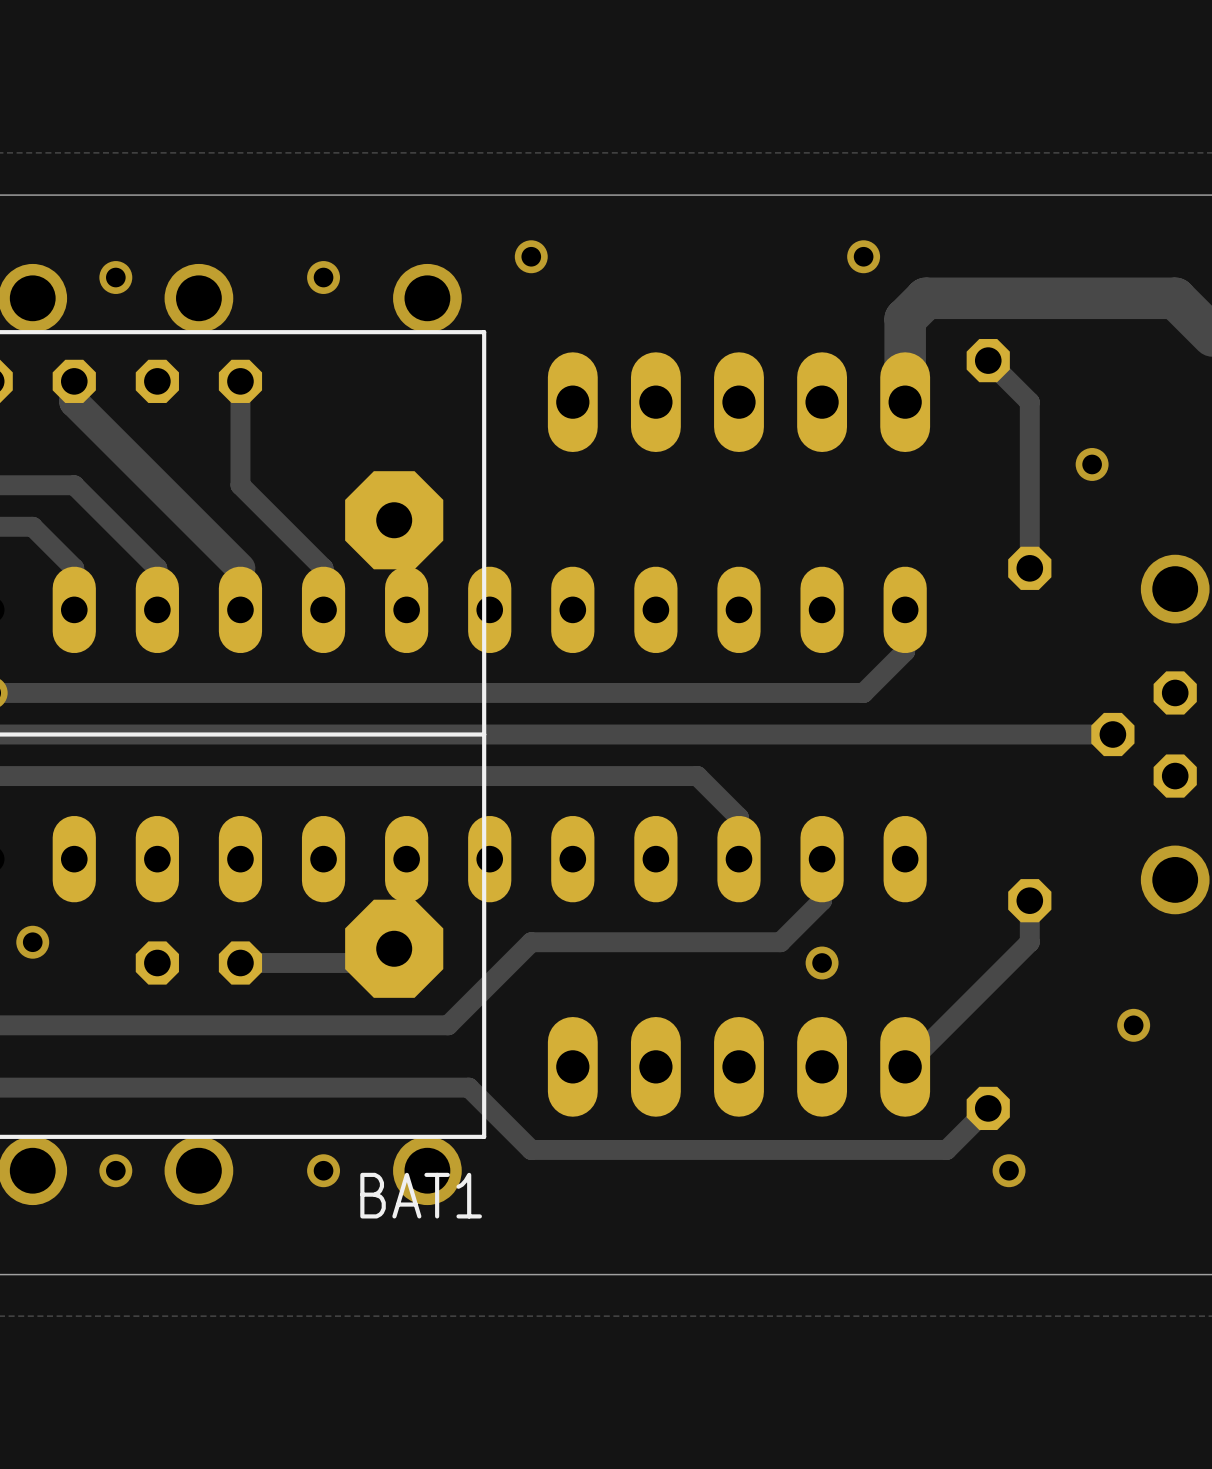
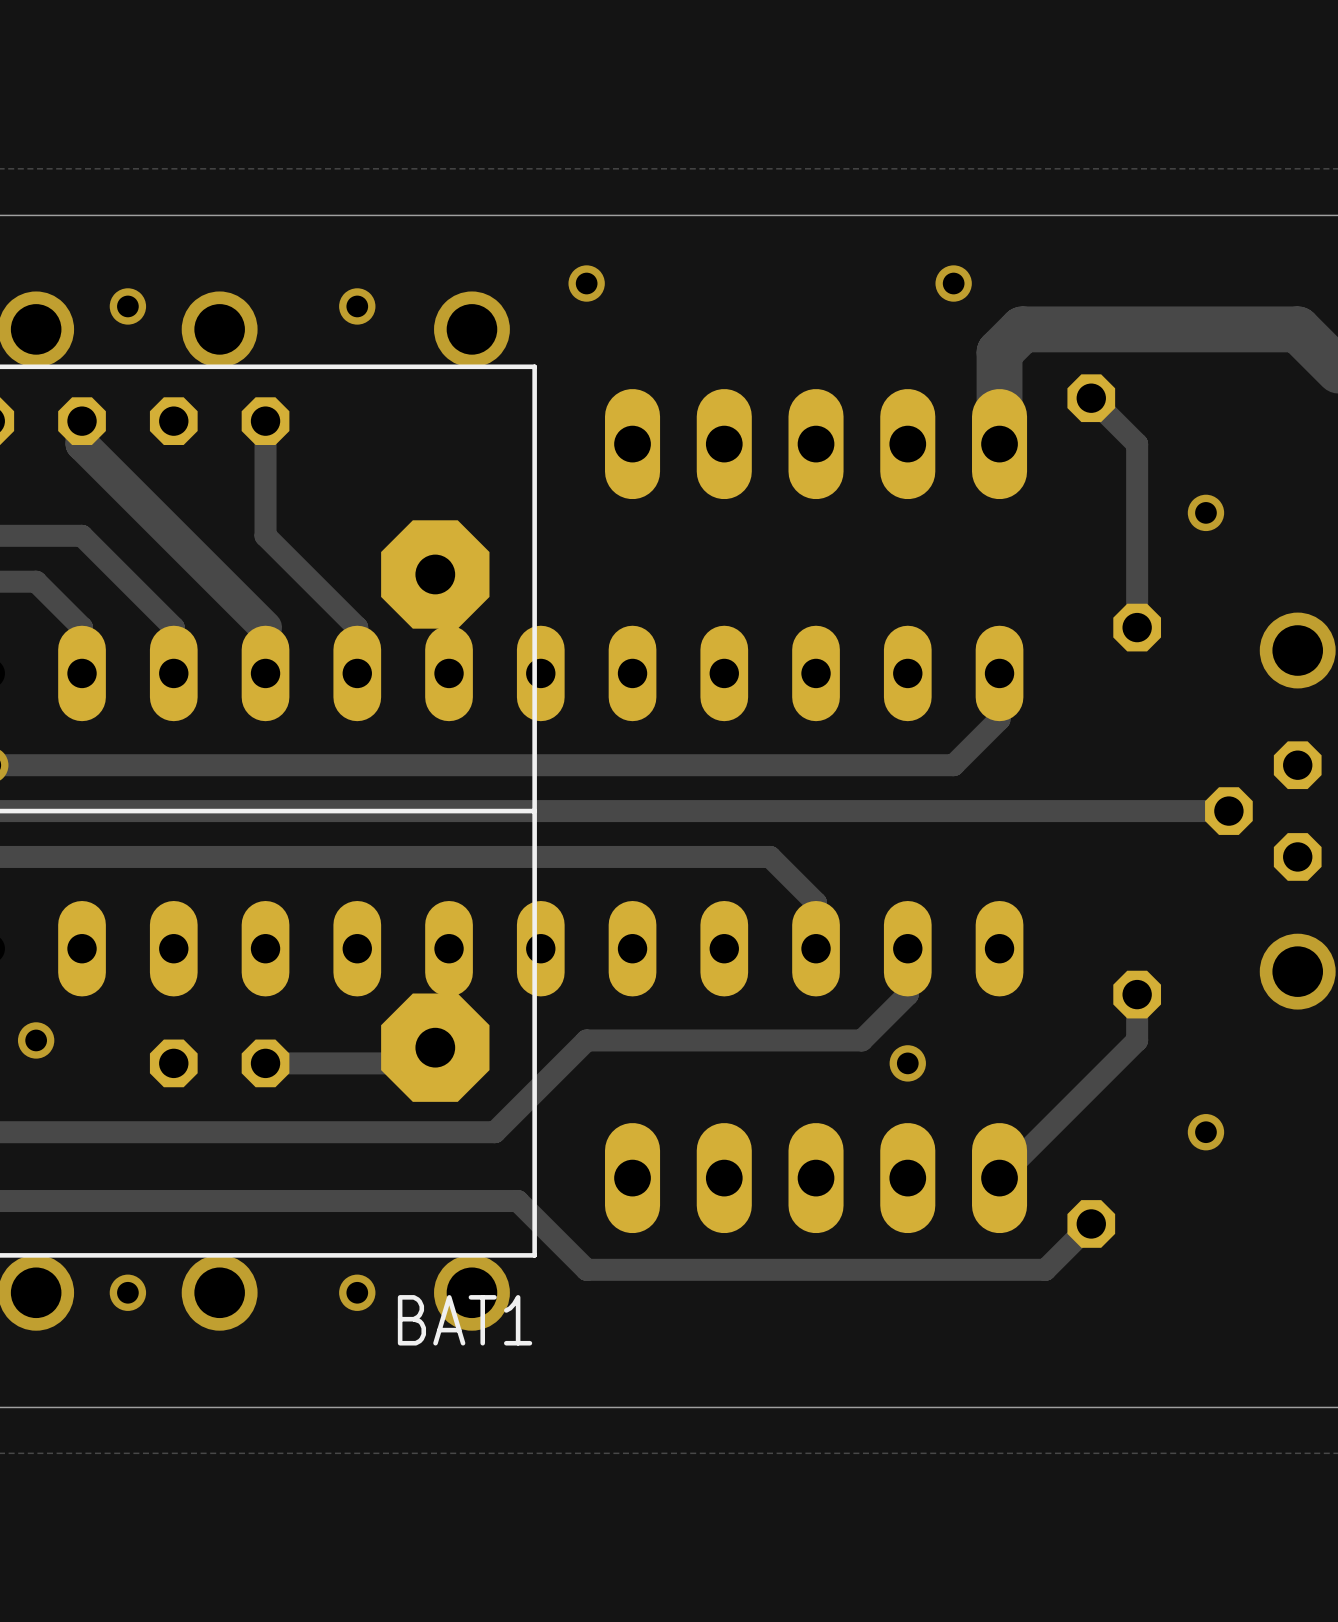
via position: (1133, 1025) -> (1205, 1132)
via: (1009, 1170) -> none

